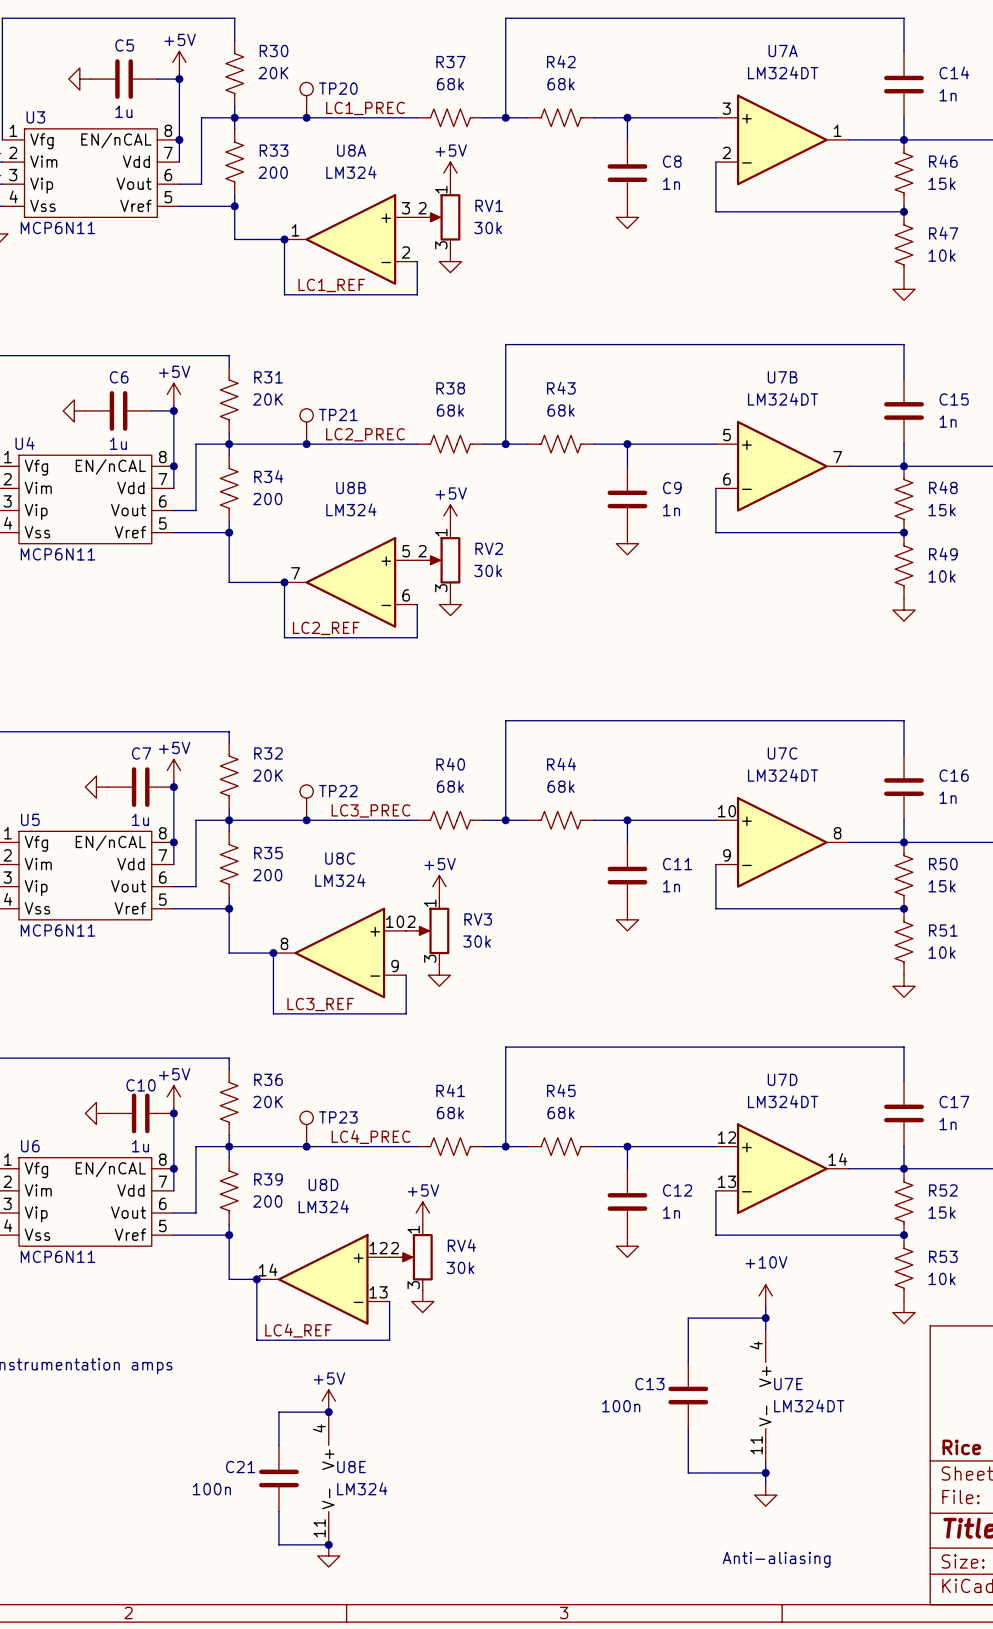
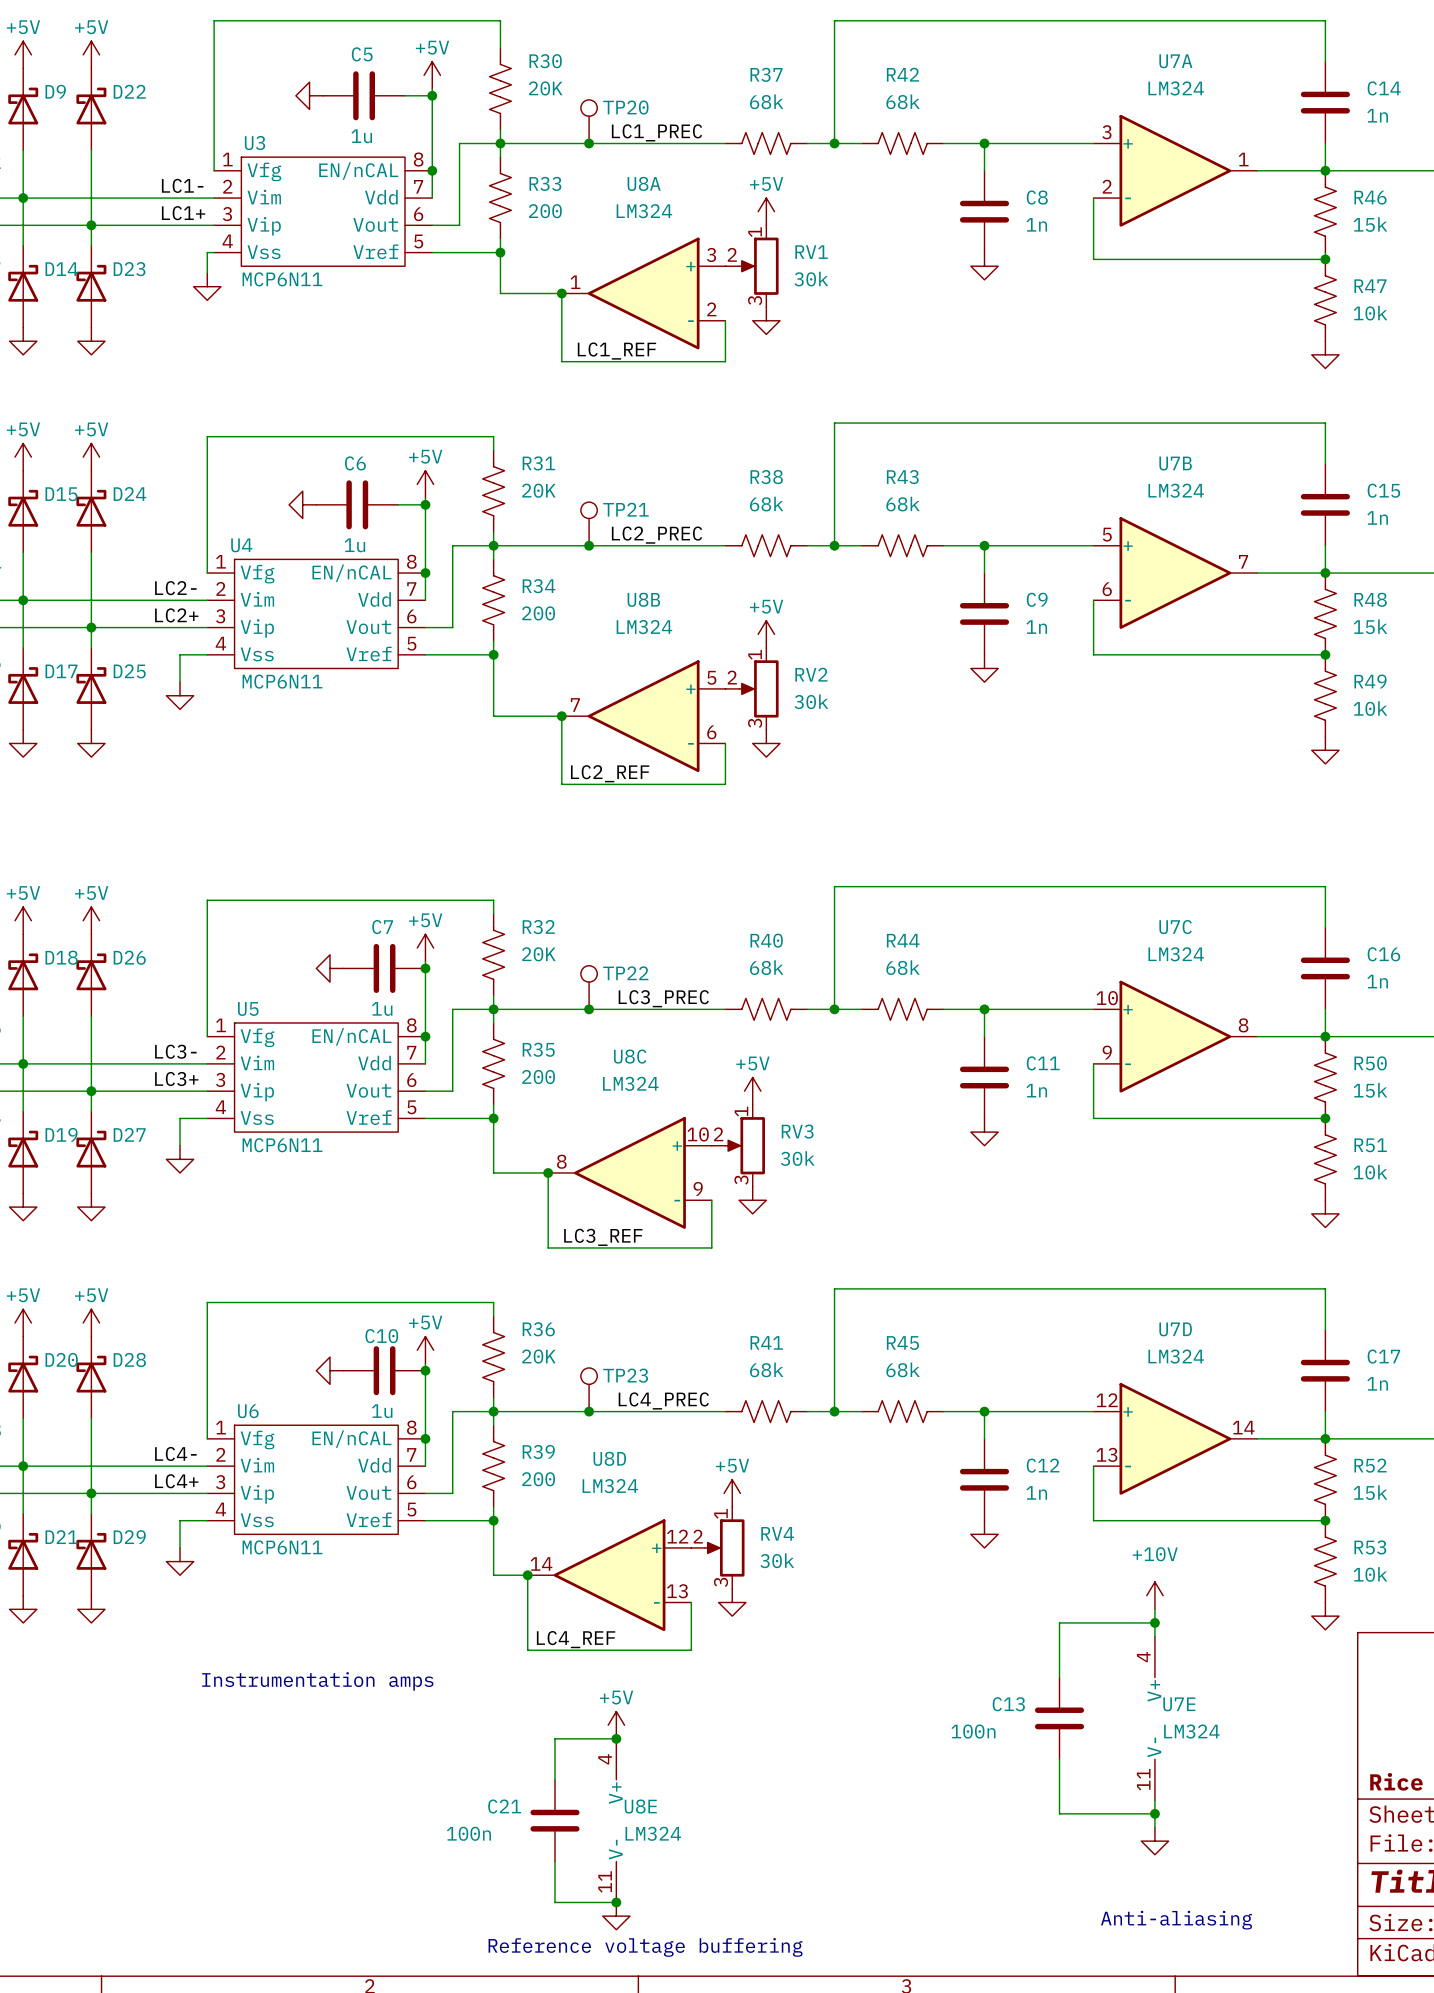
U7A value: LM324DT (783, 72) -> LM324 (1176, 88)
U7B value: LM324DT (783, 399) -> LM324 (1176, 490)
U7C value: LM324DT (783, 775) -> LM324 (1176, 954)
U7D value: LM324DT (783, 1101) -> LM324 (1176, 1356)
U7E value: LM324DT (809, 1405) -> LM324 (1191, 1731)
text: none -> Reference voltage buffering (645, 1947)

